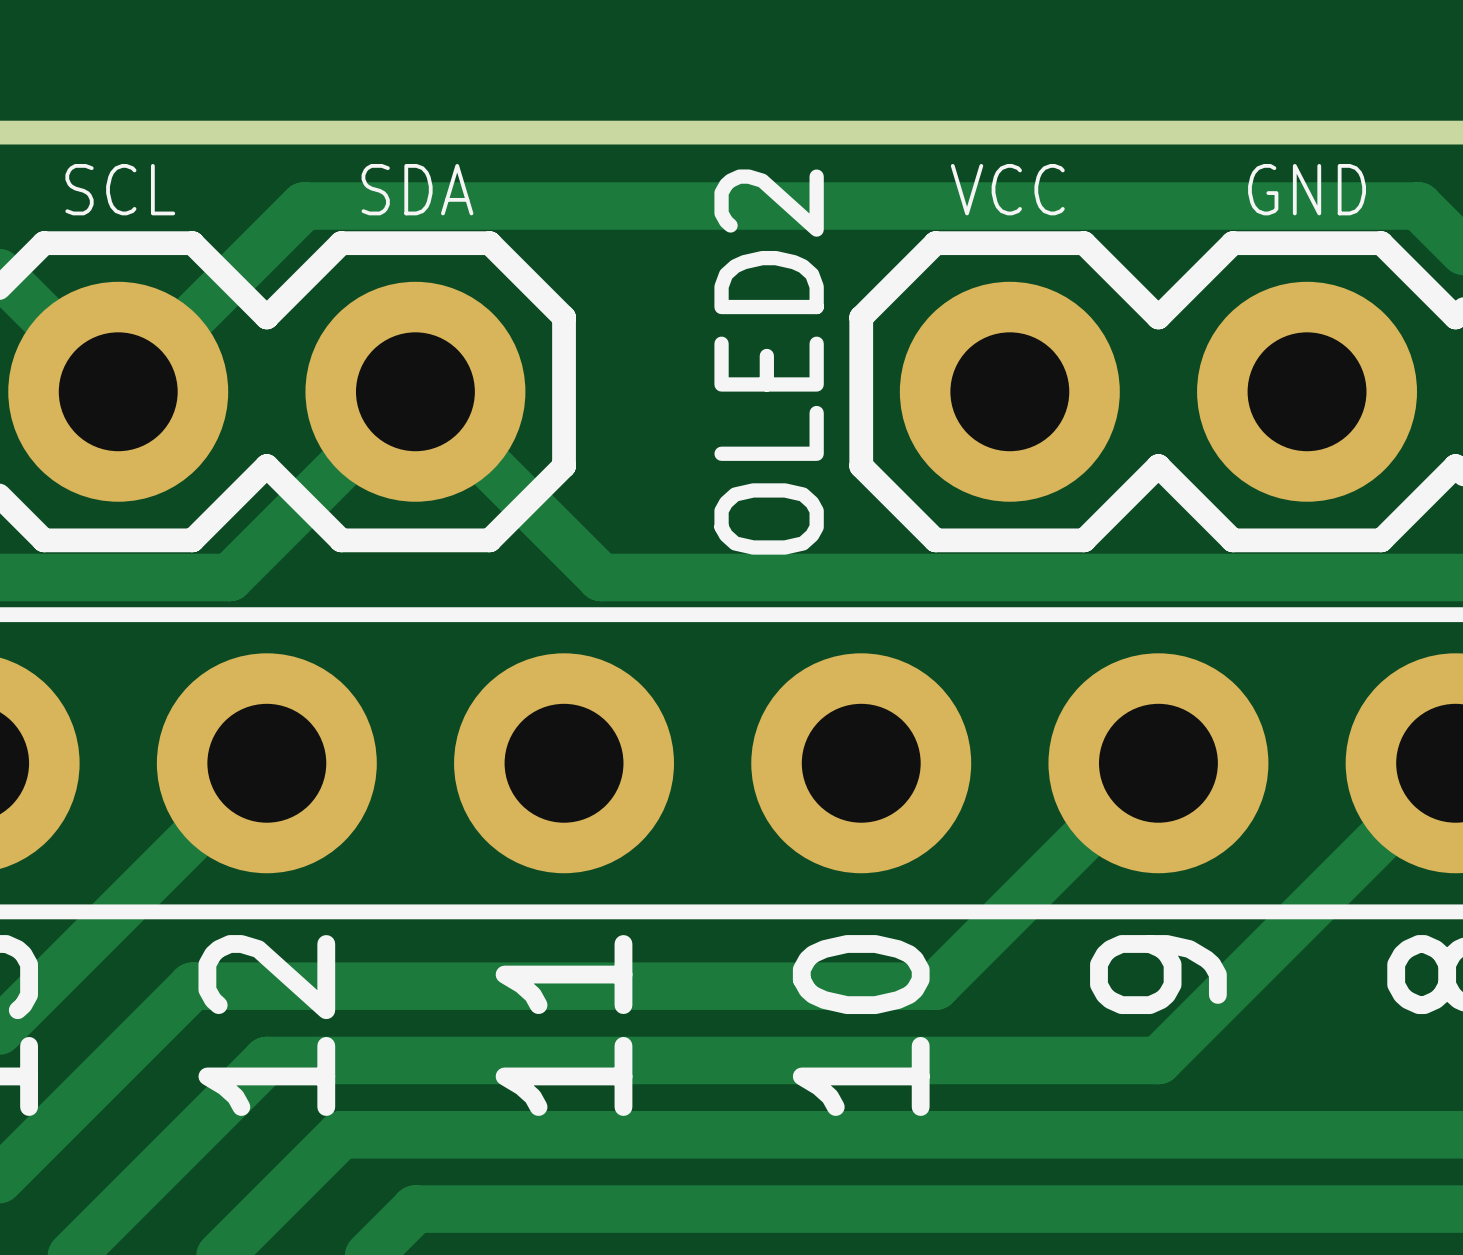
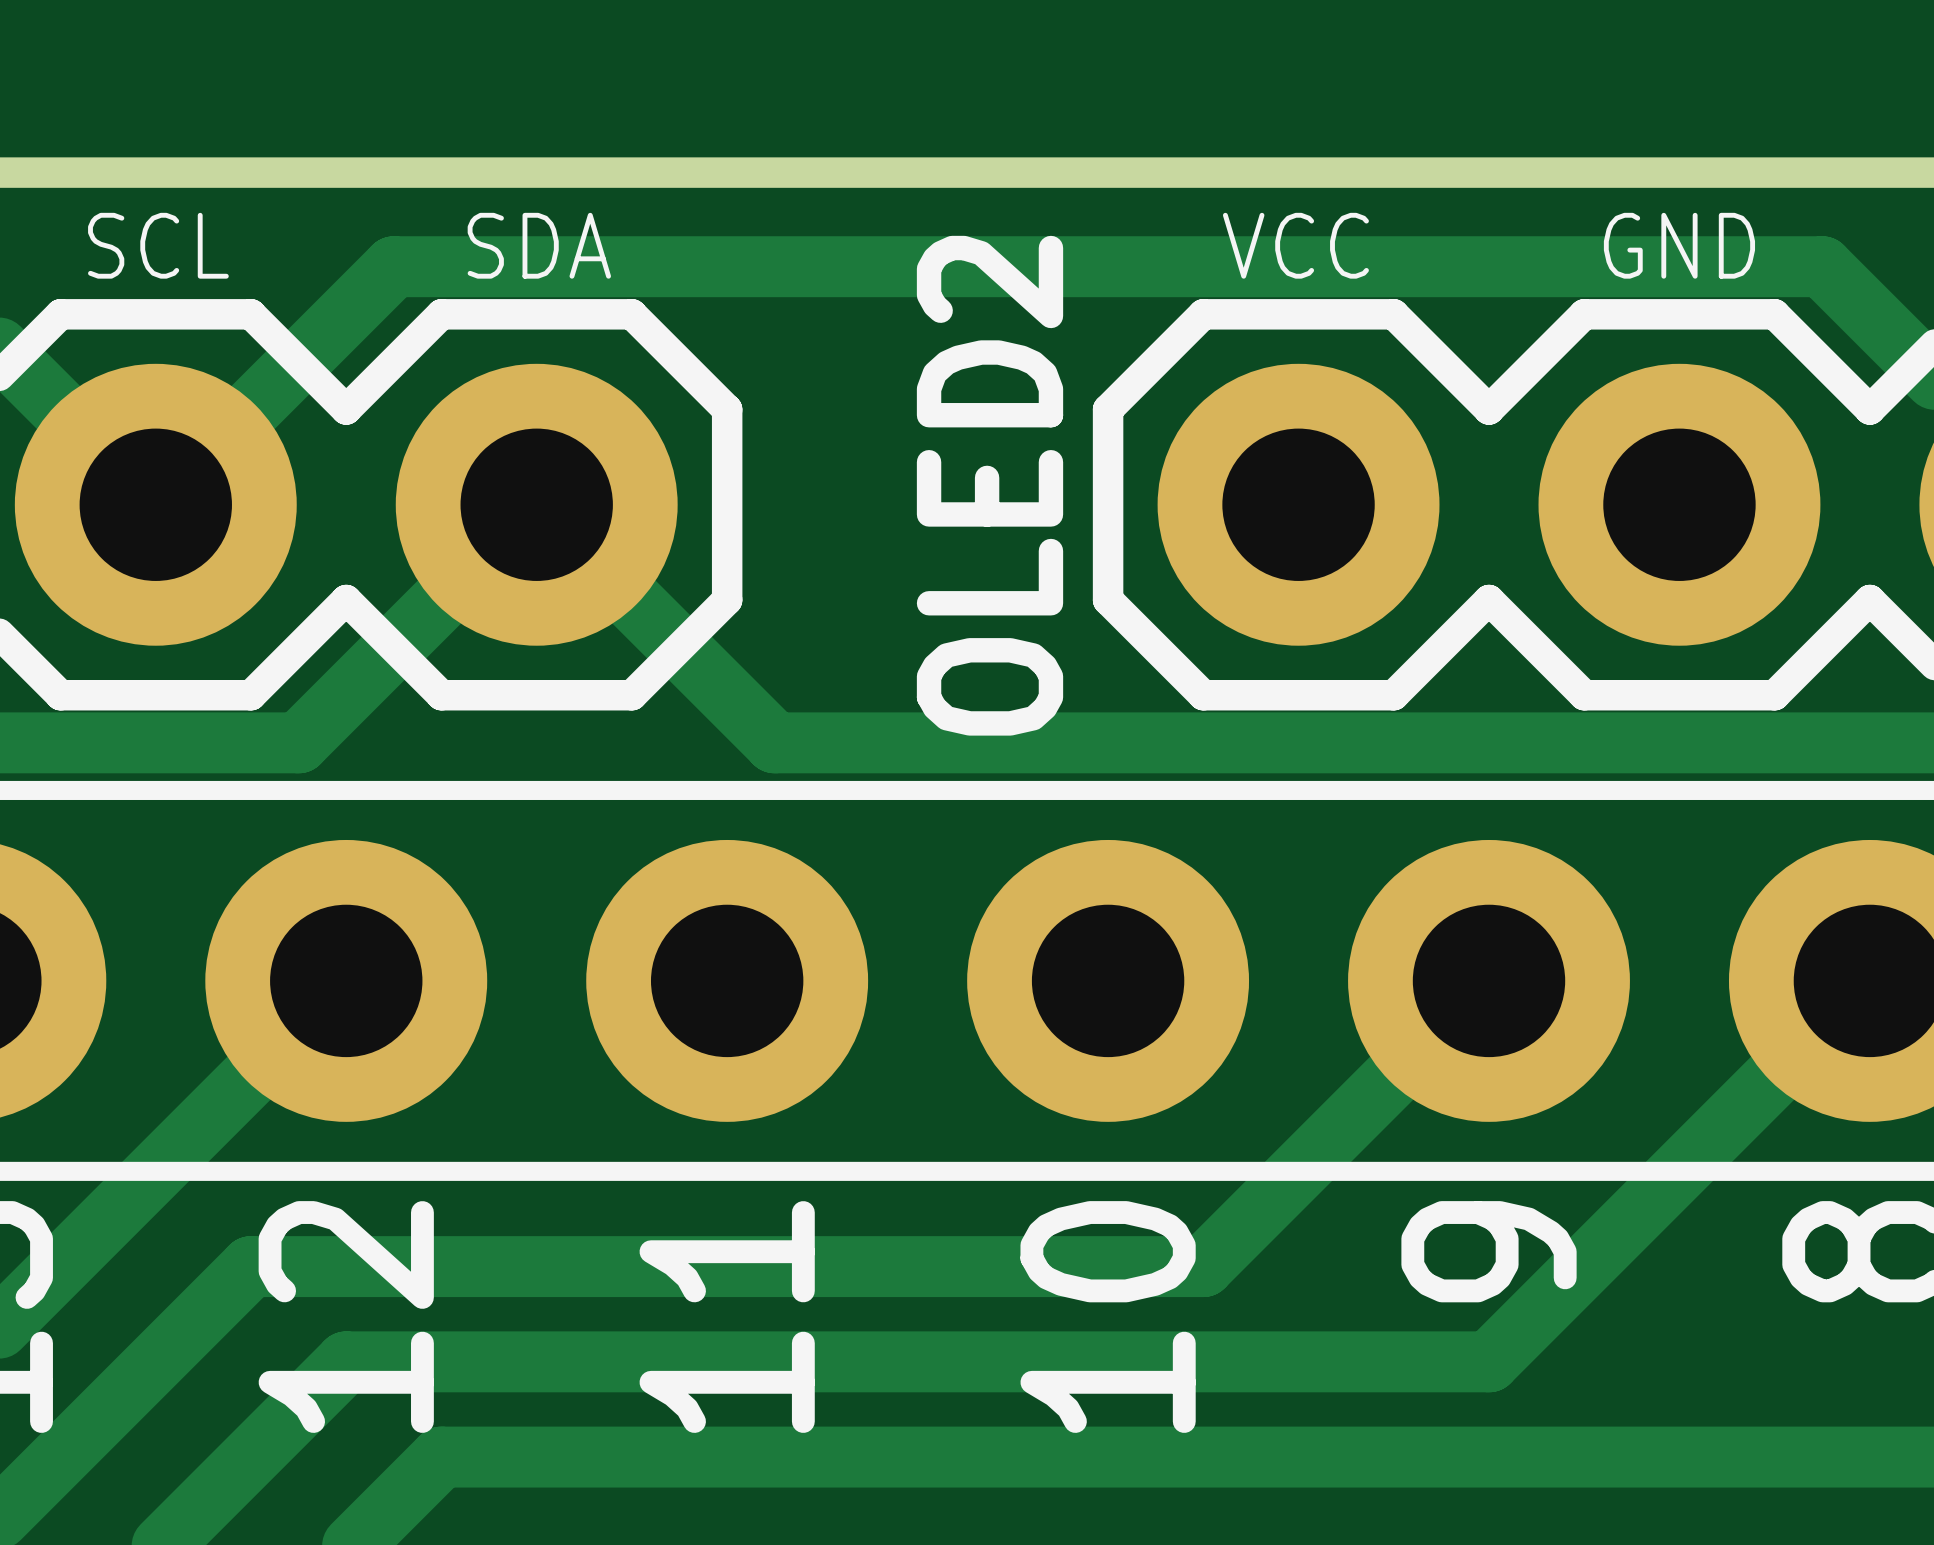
OLED2 name position: OLED2 (769, 362) -> OLED2 (990, 485)

